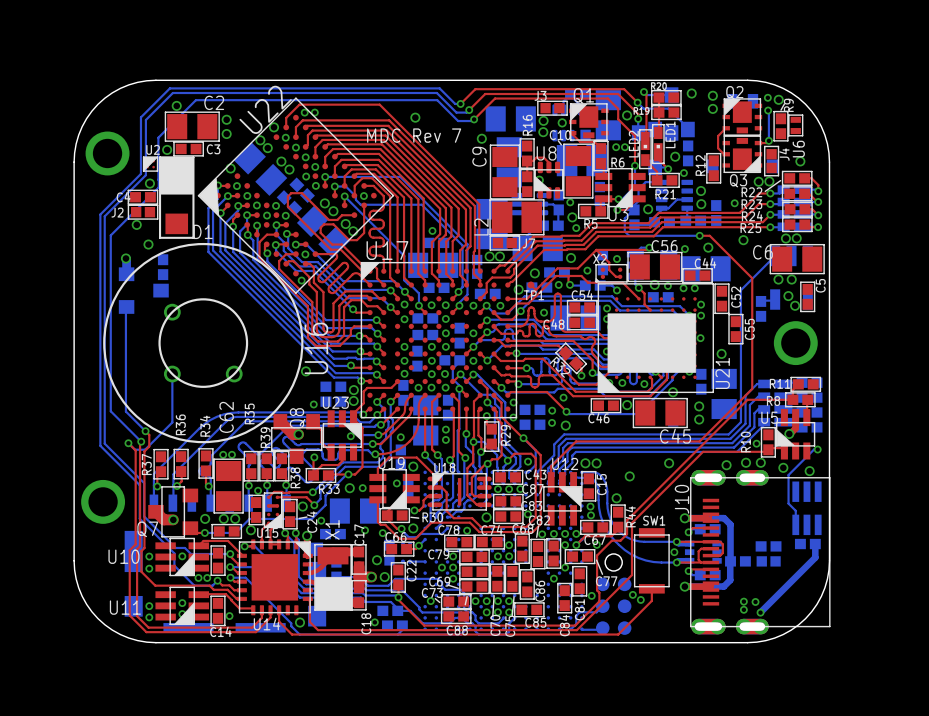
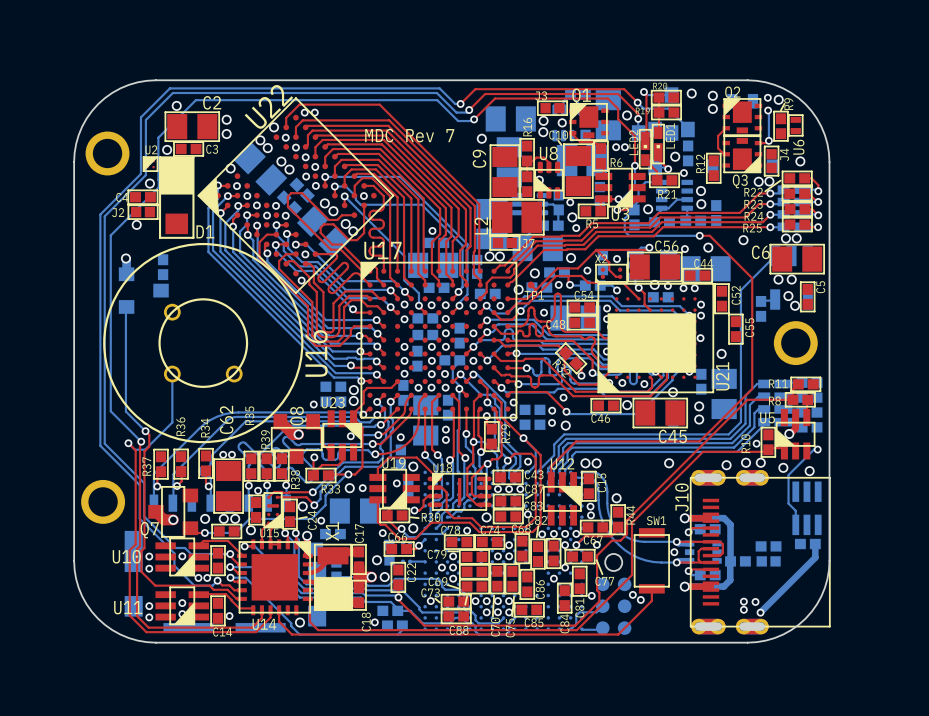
via: (415, 117) -> none
via: (734, 203) -> none
via: (148, 244) -> none
via: (305, 371) -> none
via: (629, 476) -> none
via: (365, 530) -> none

